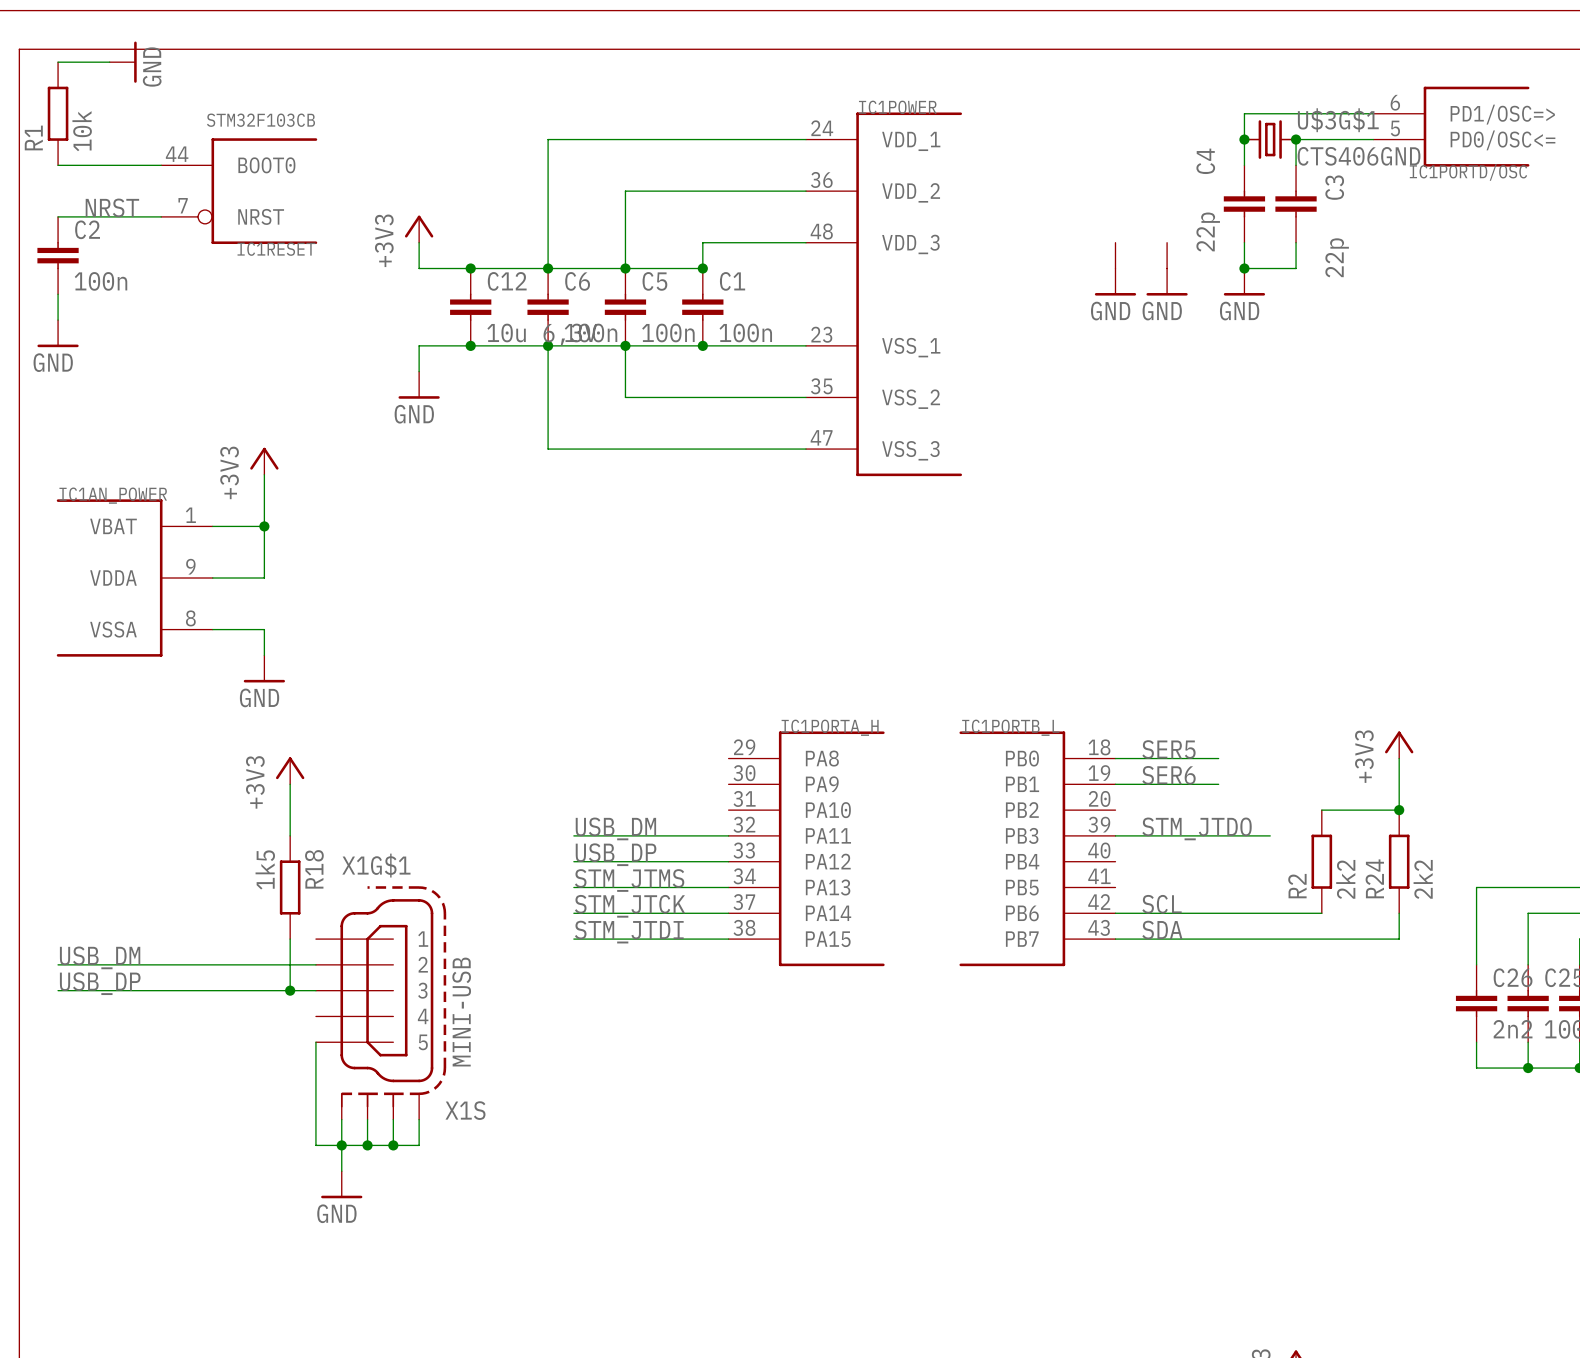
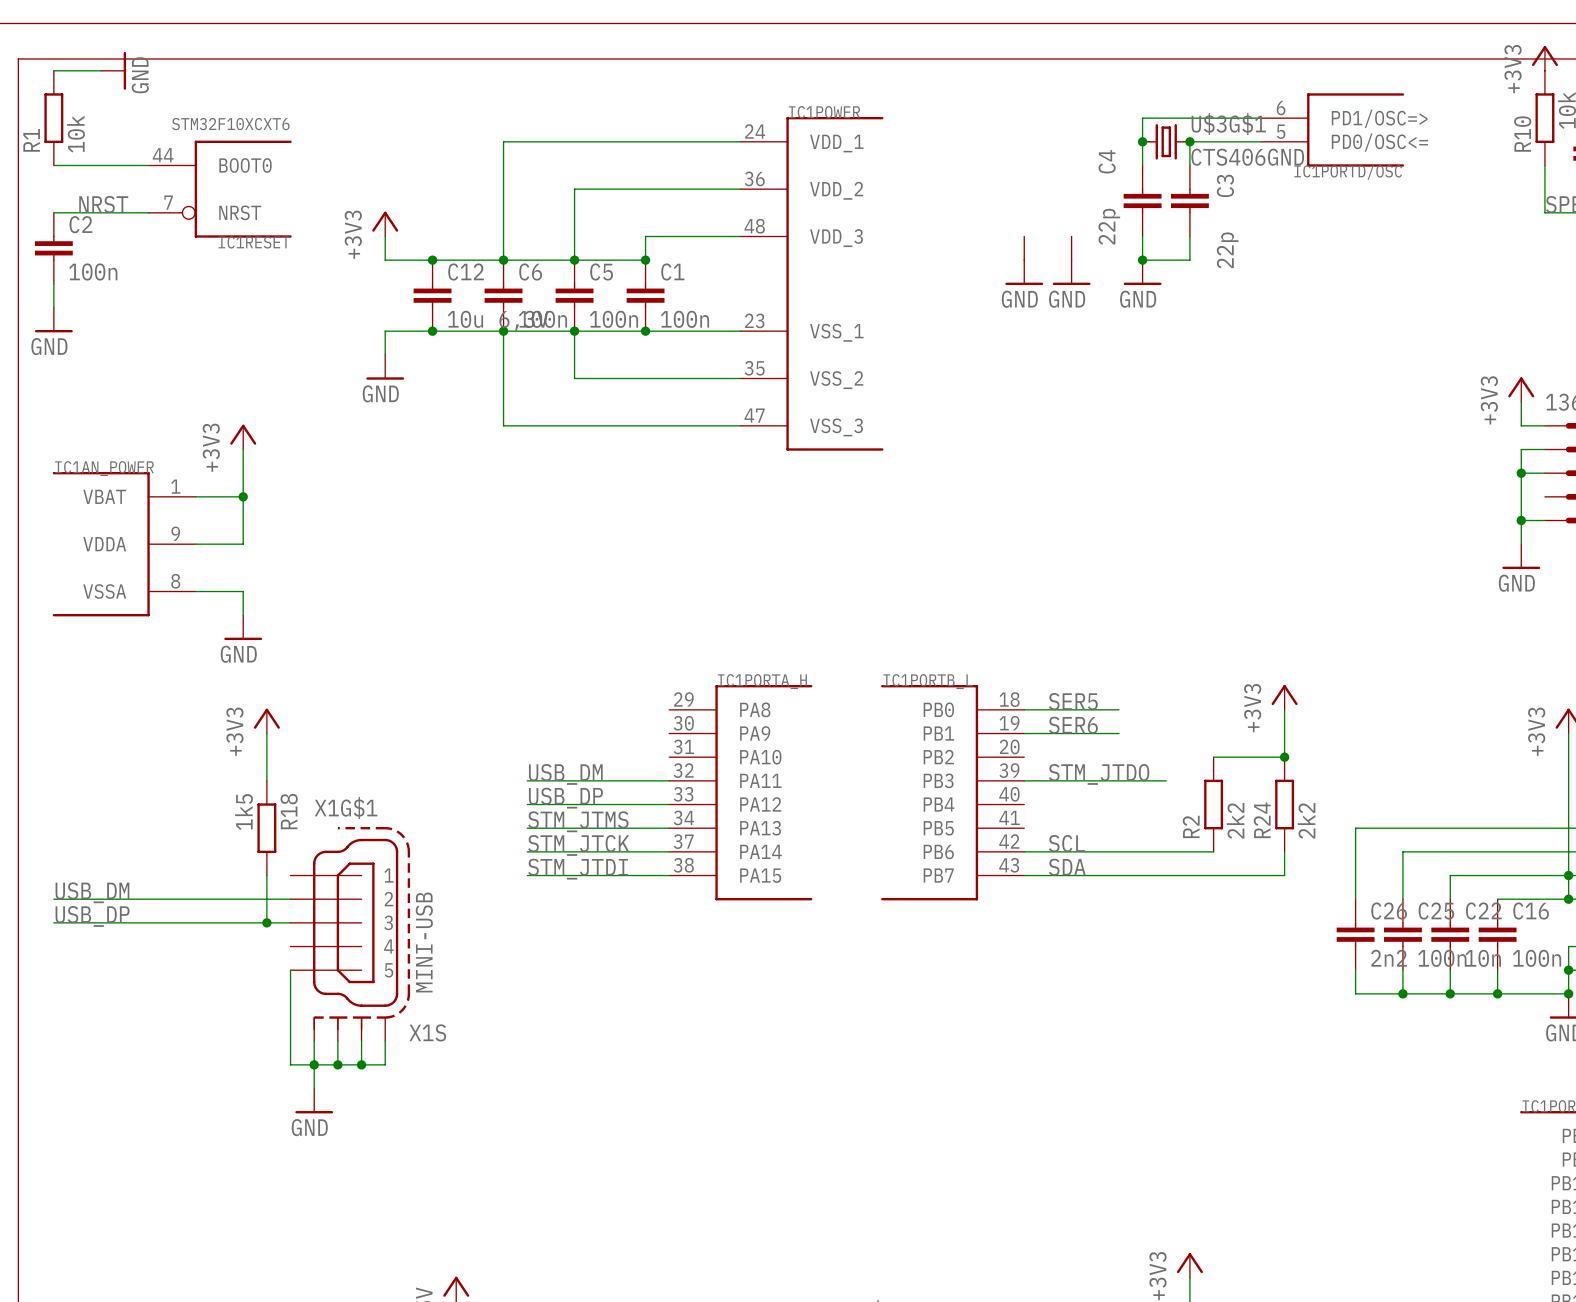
IC1RESET value: STM32F103CB (260, 120) -> STM32F10XCXT6 (230, 124)

